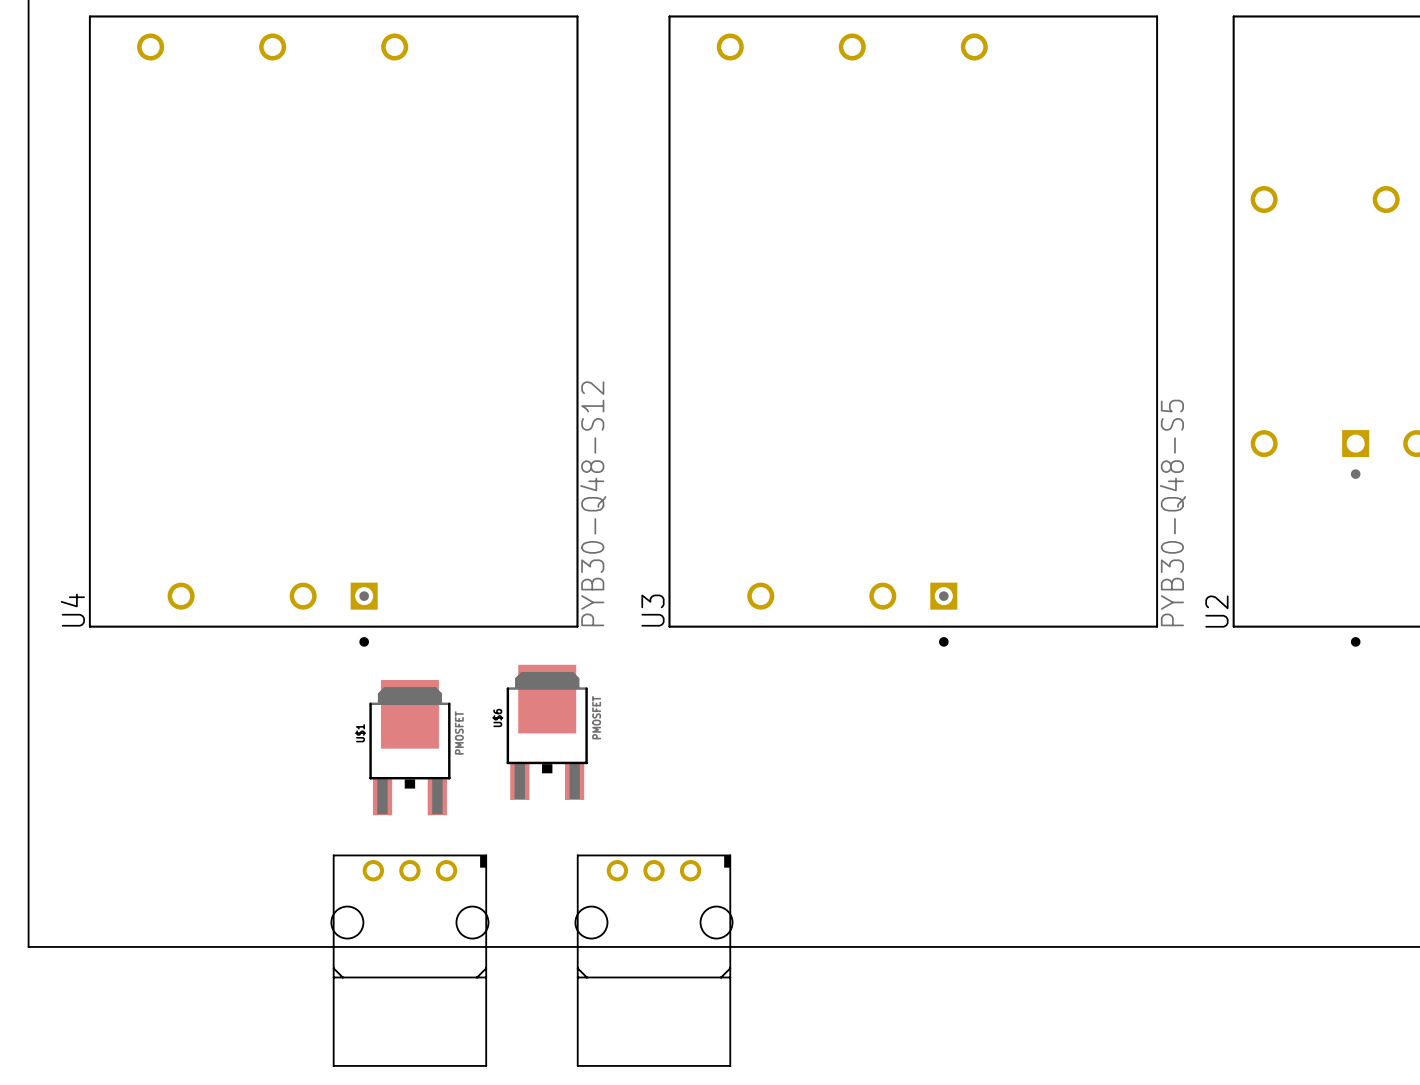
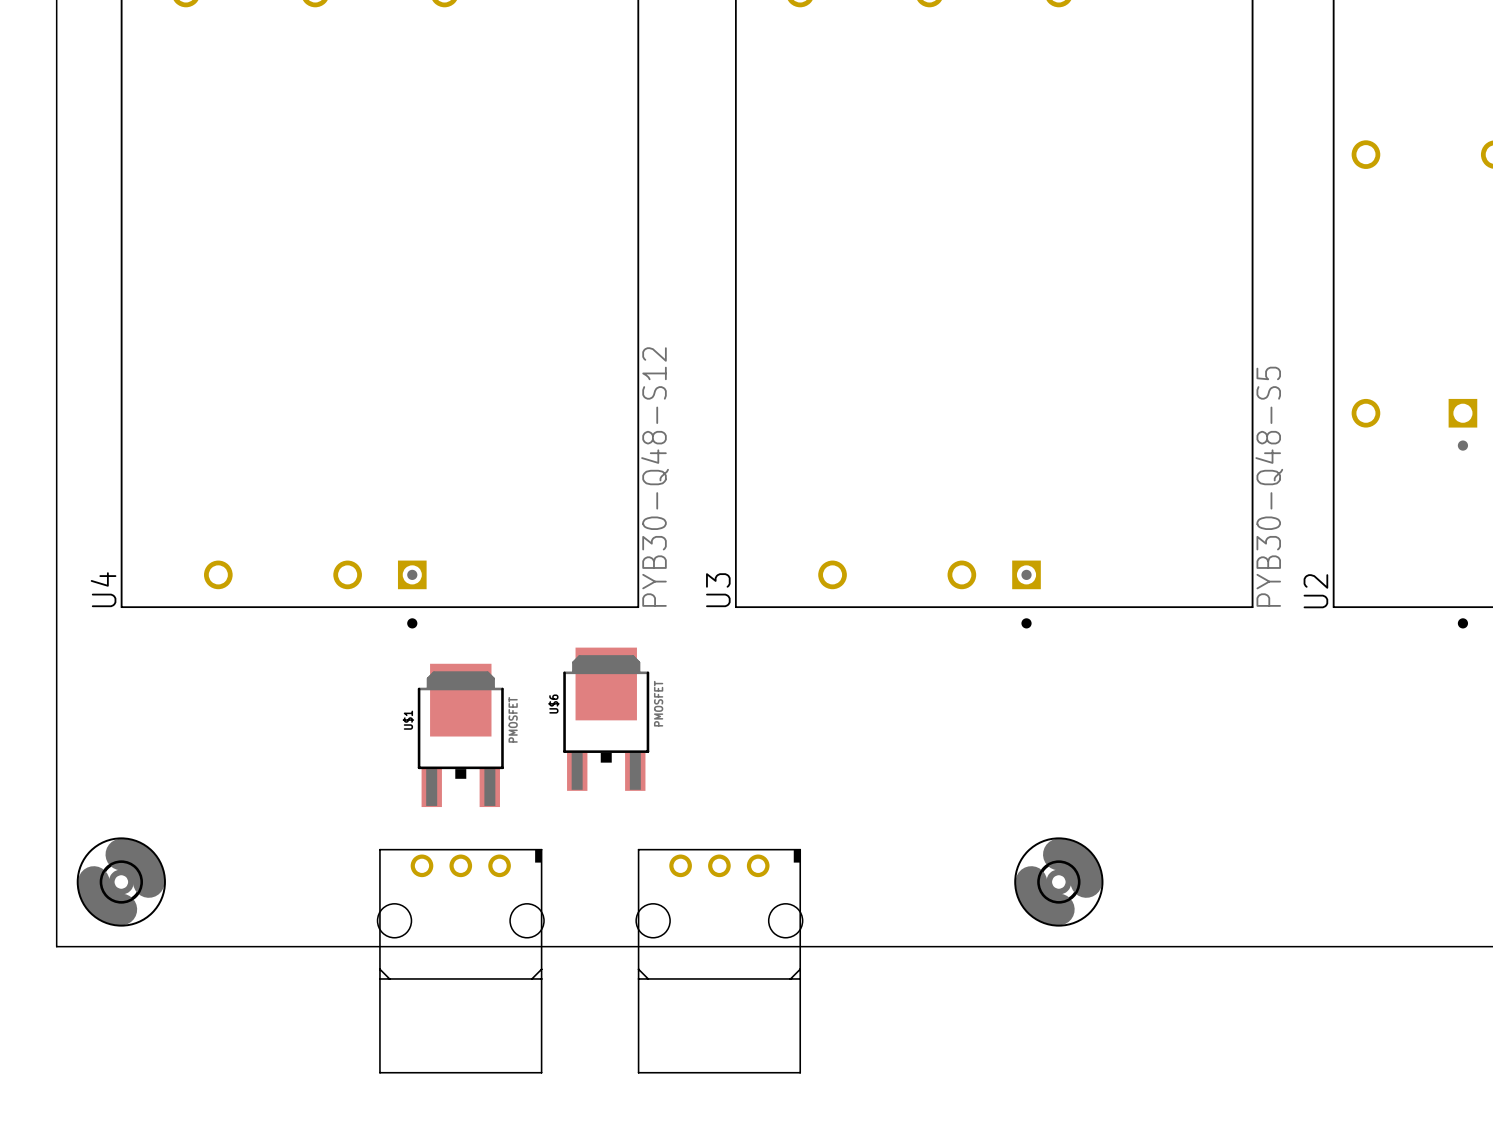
part: none -> (121, 882)
part: none -> (1058, 882)

